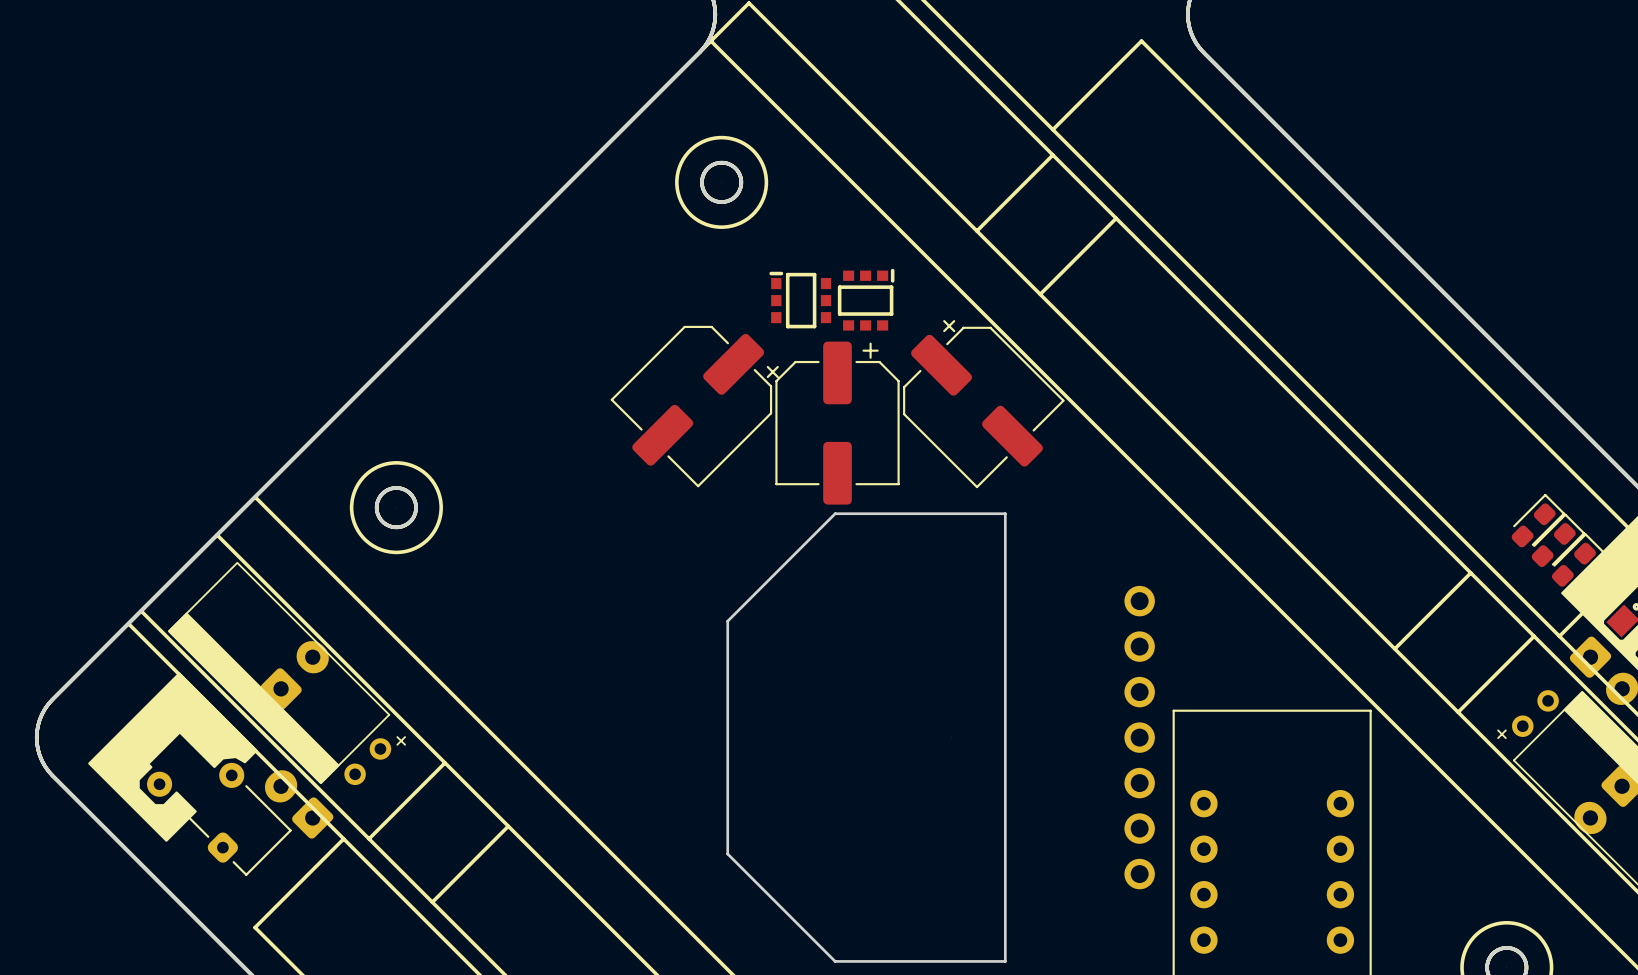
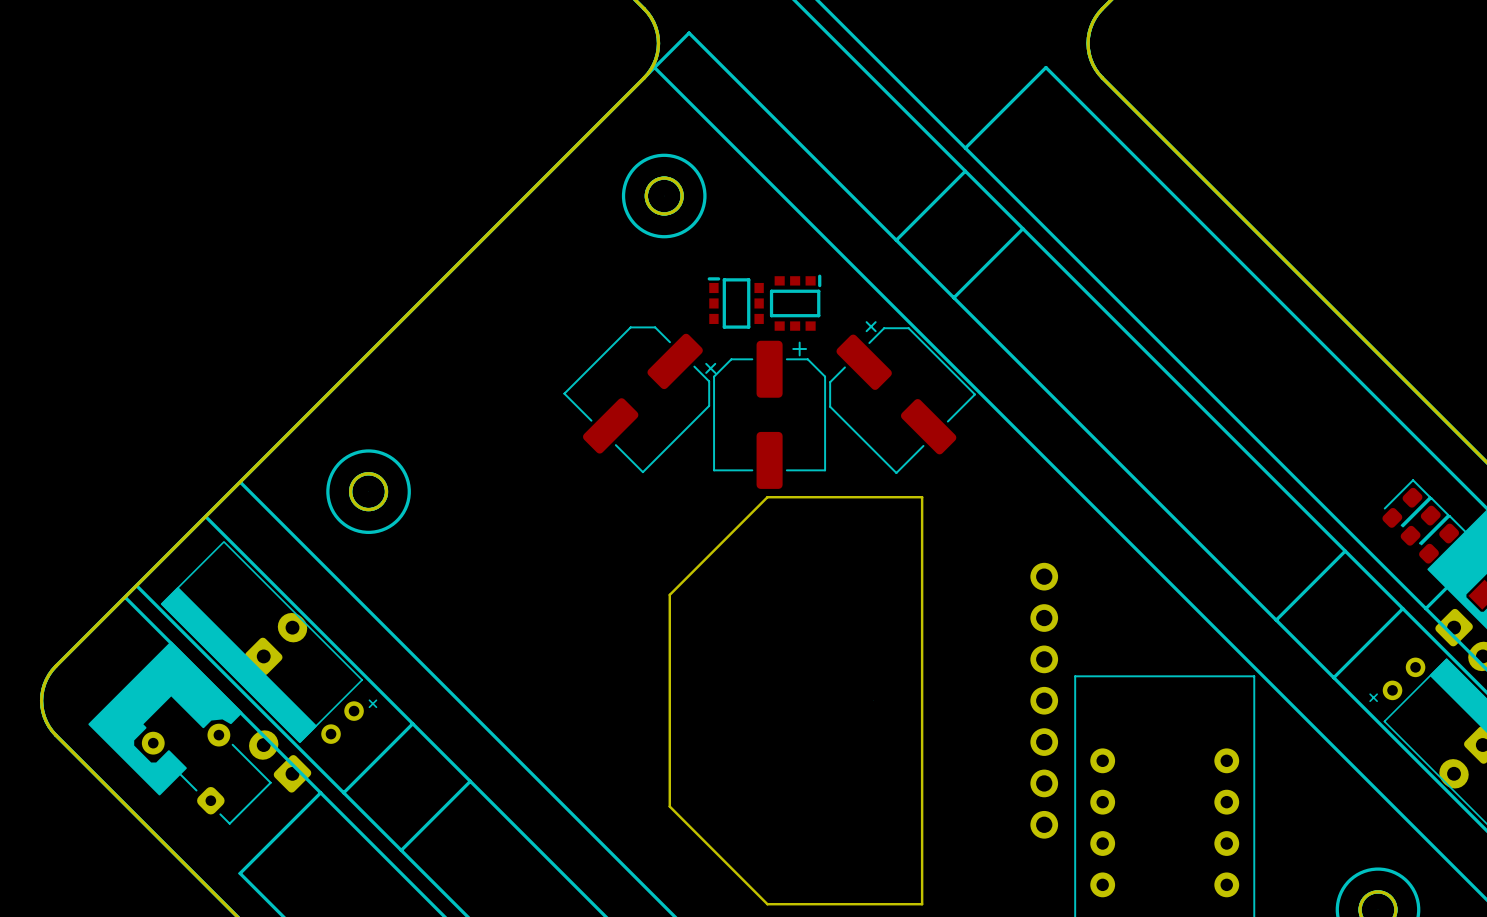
part footprint: [88, 672, 292, 876] -> [88, 641, 272, 825]

